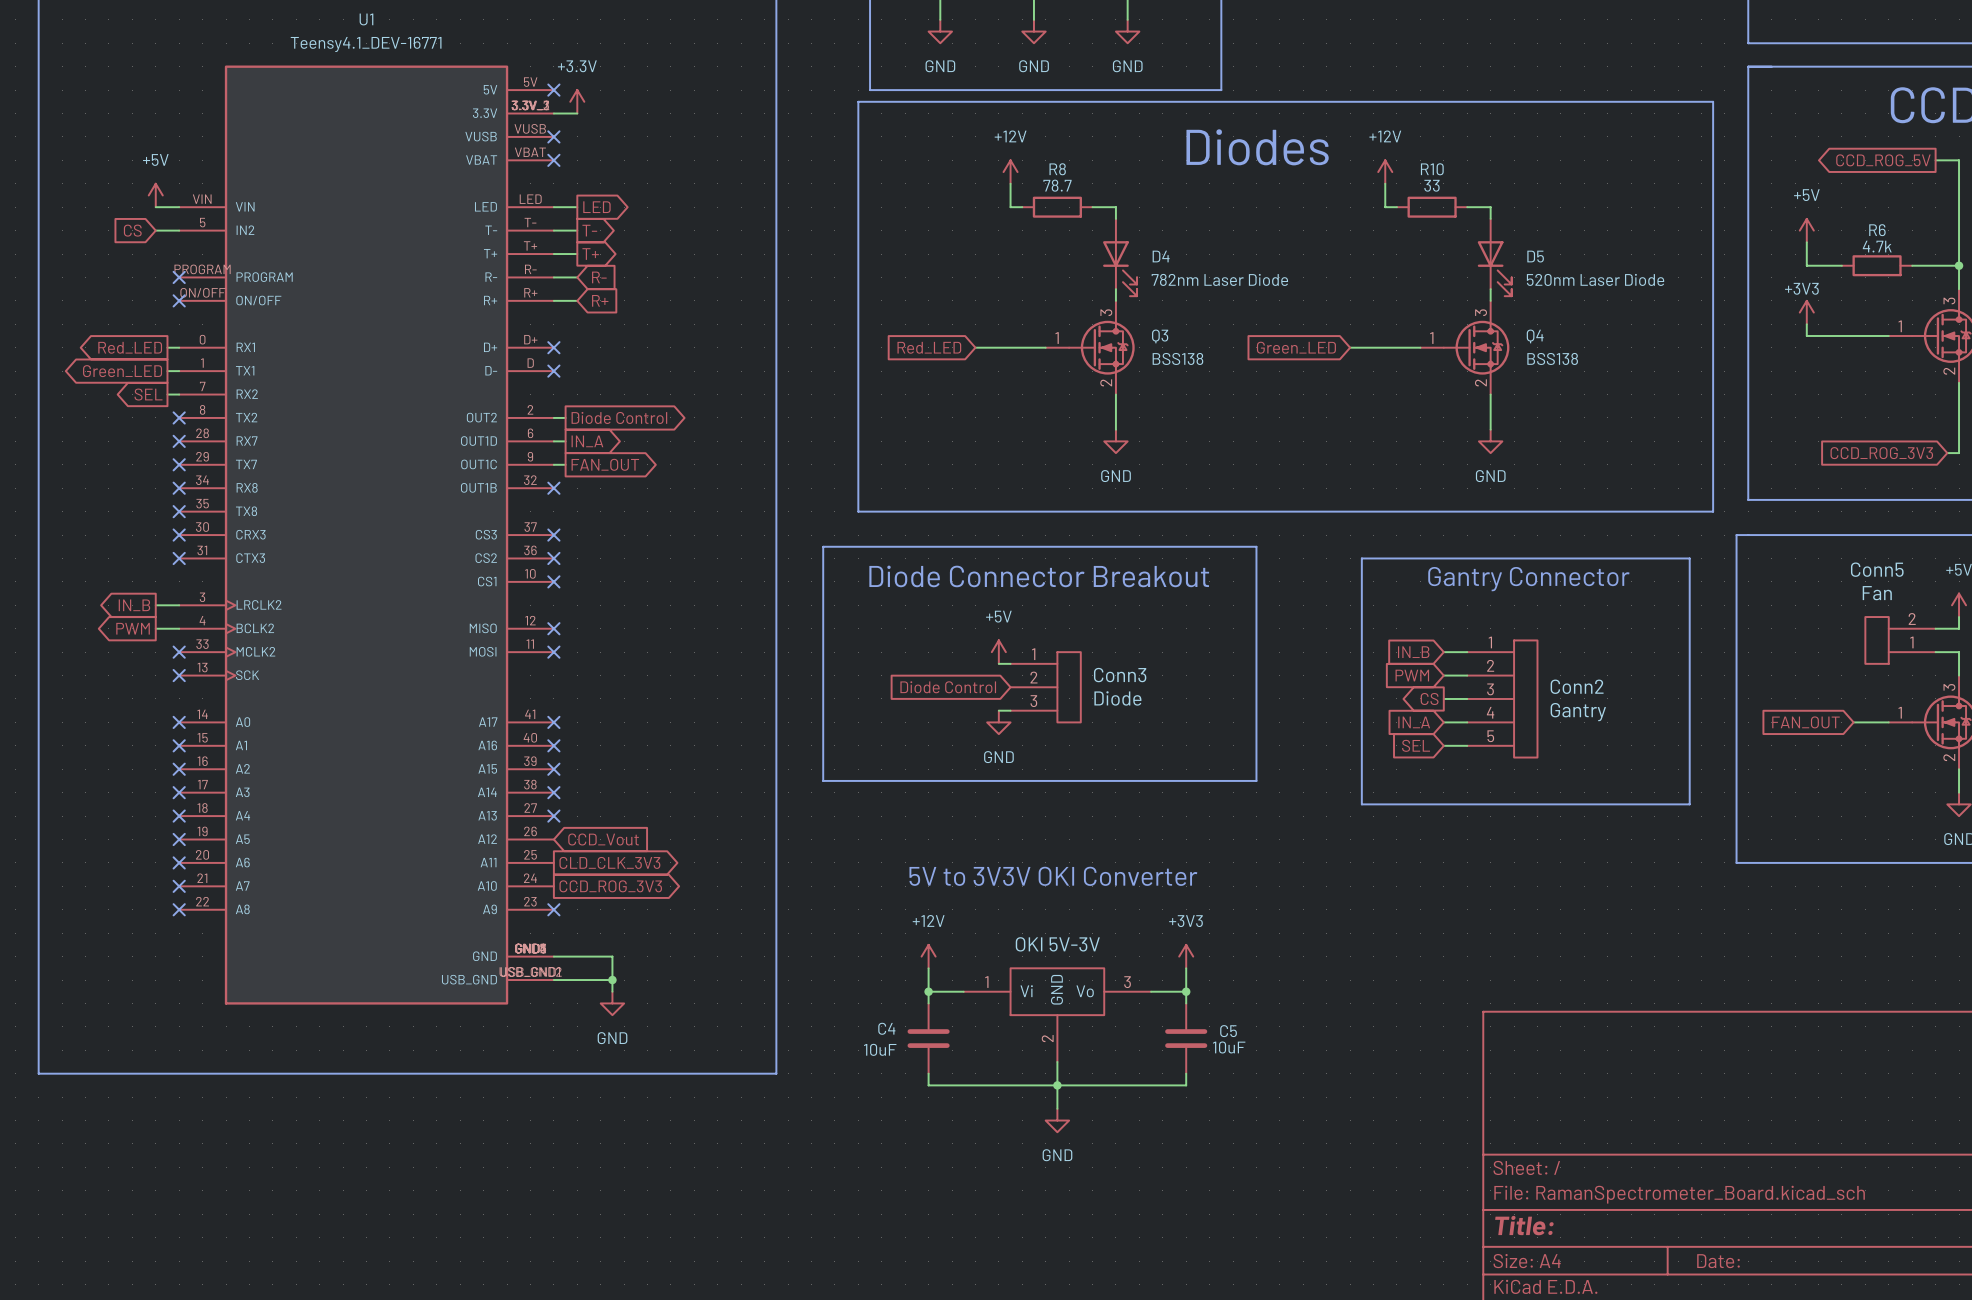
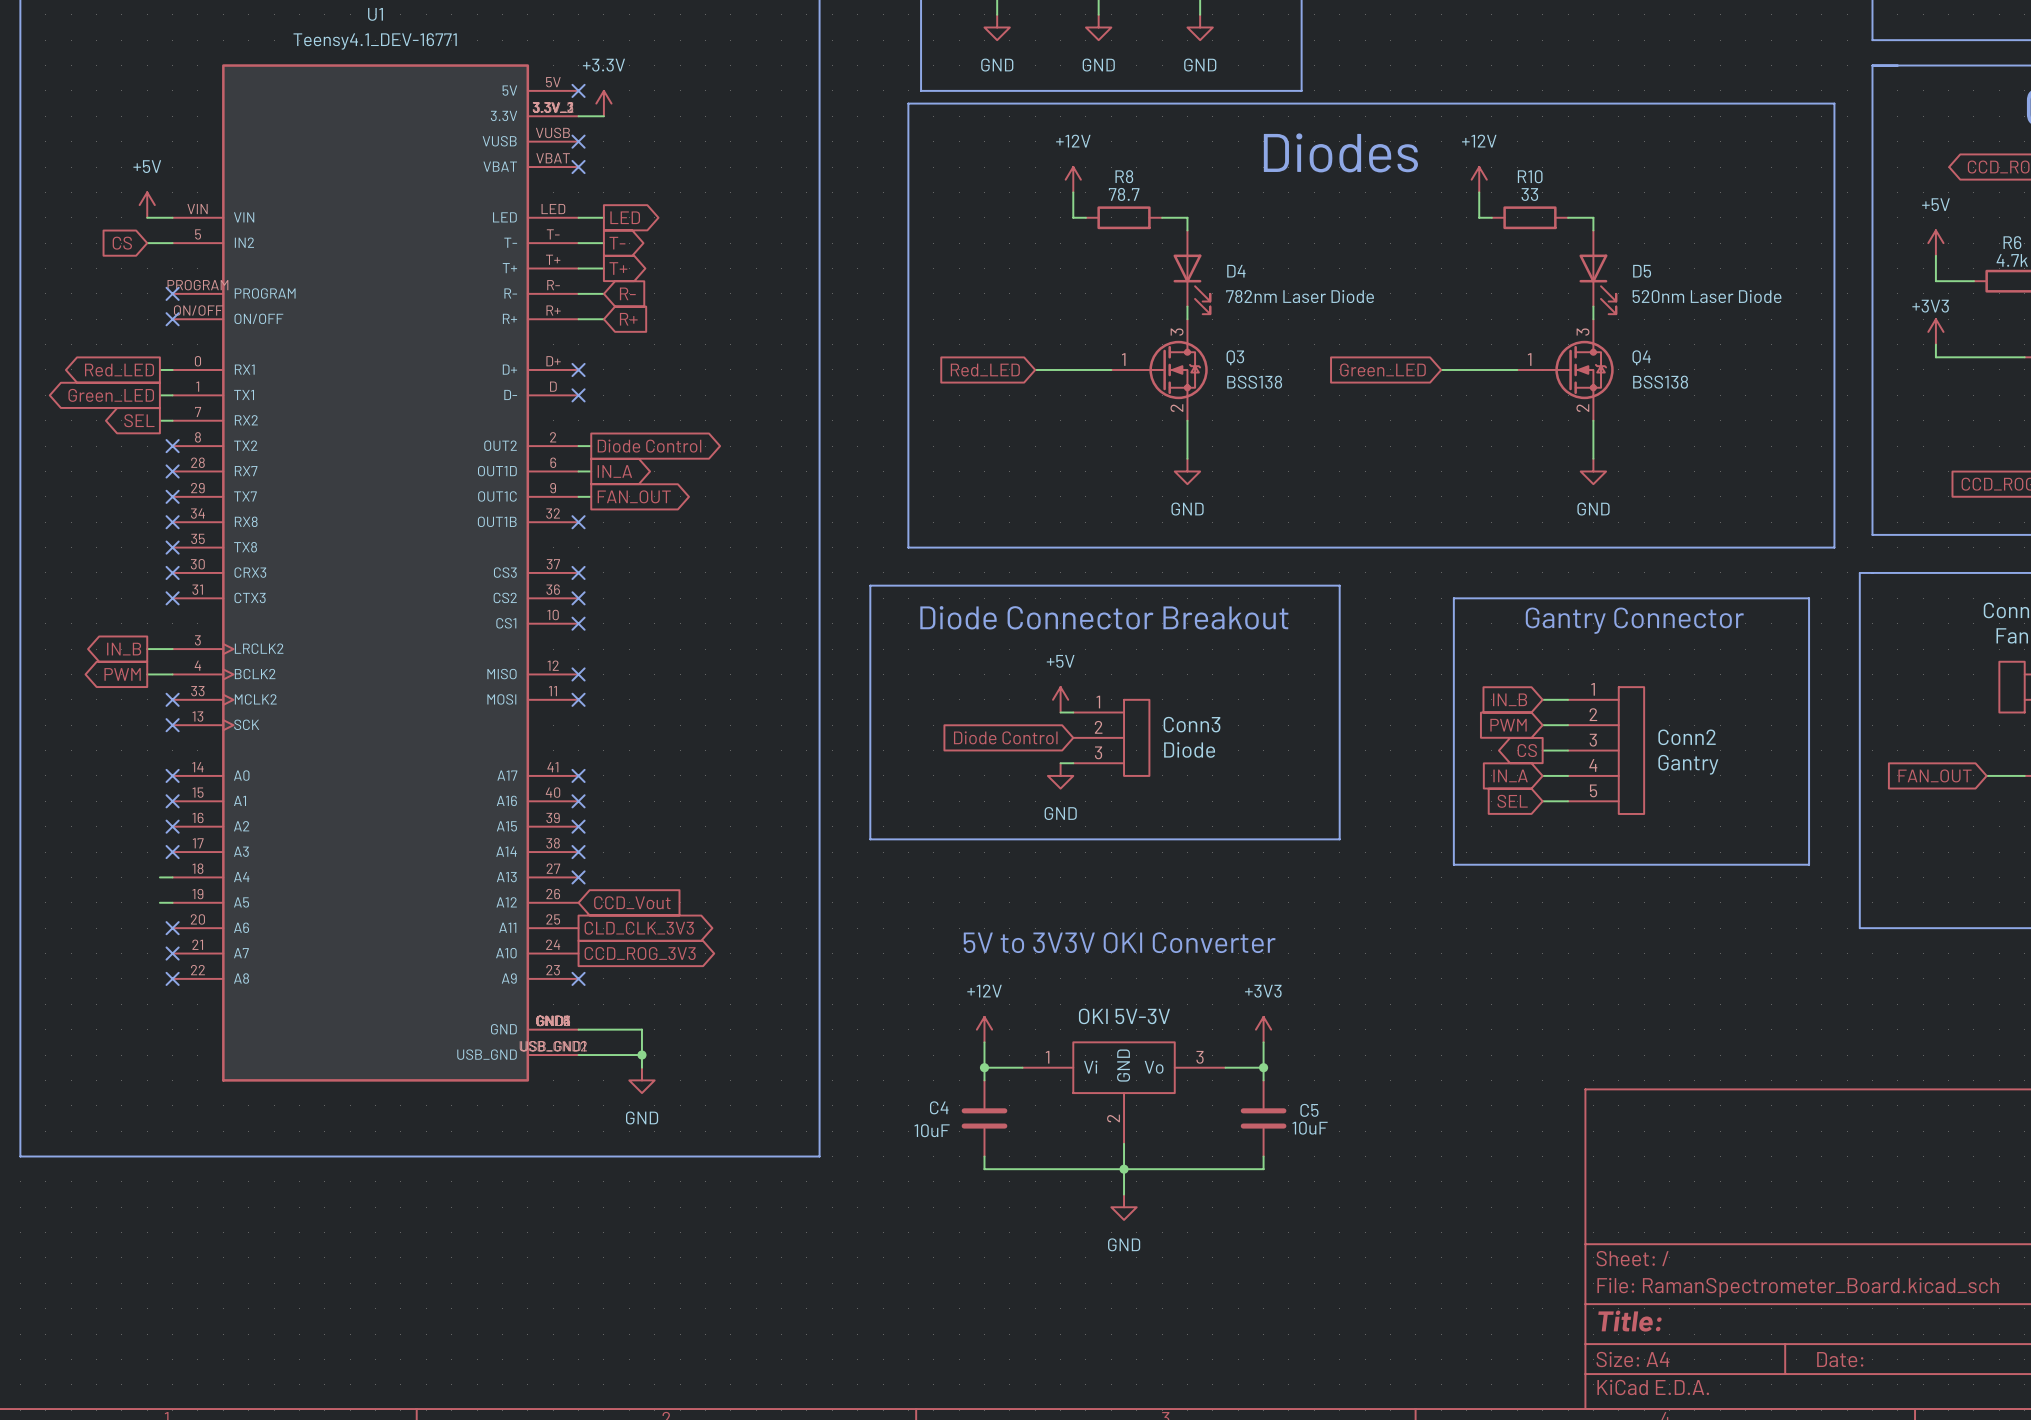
wire: none -> (159, 877) (172, 877)
no-connect mark: (179, 816) -> none
wire: none -> (159, 902) (172, 902)
no-connect mark: (179, 839) -> none

